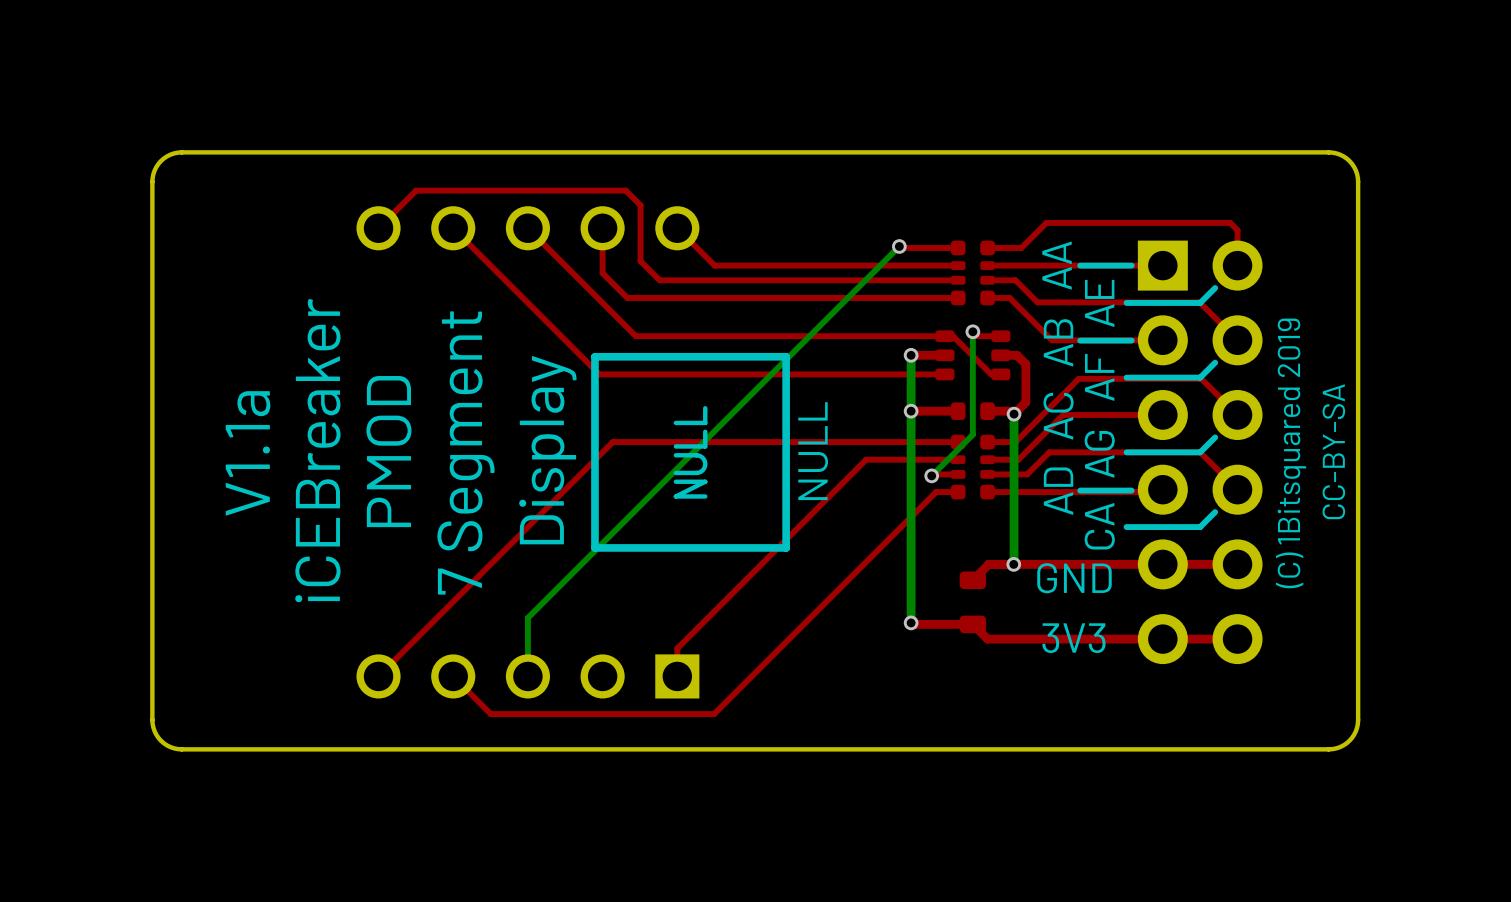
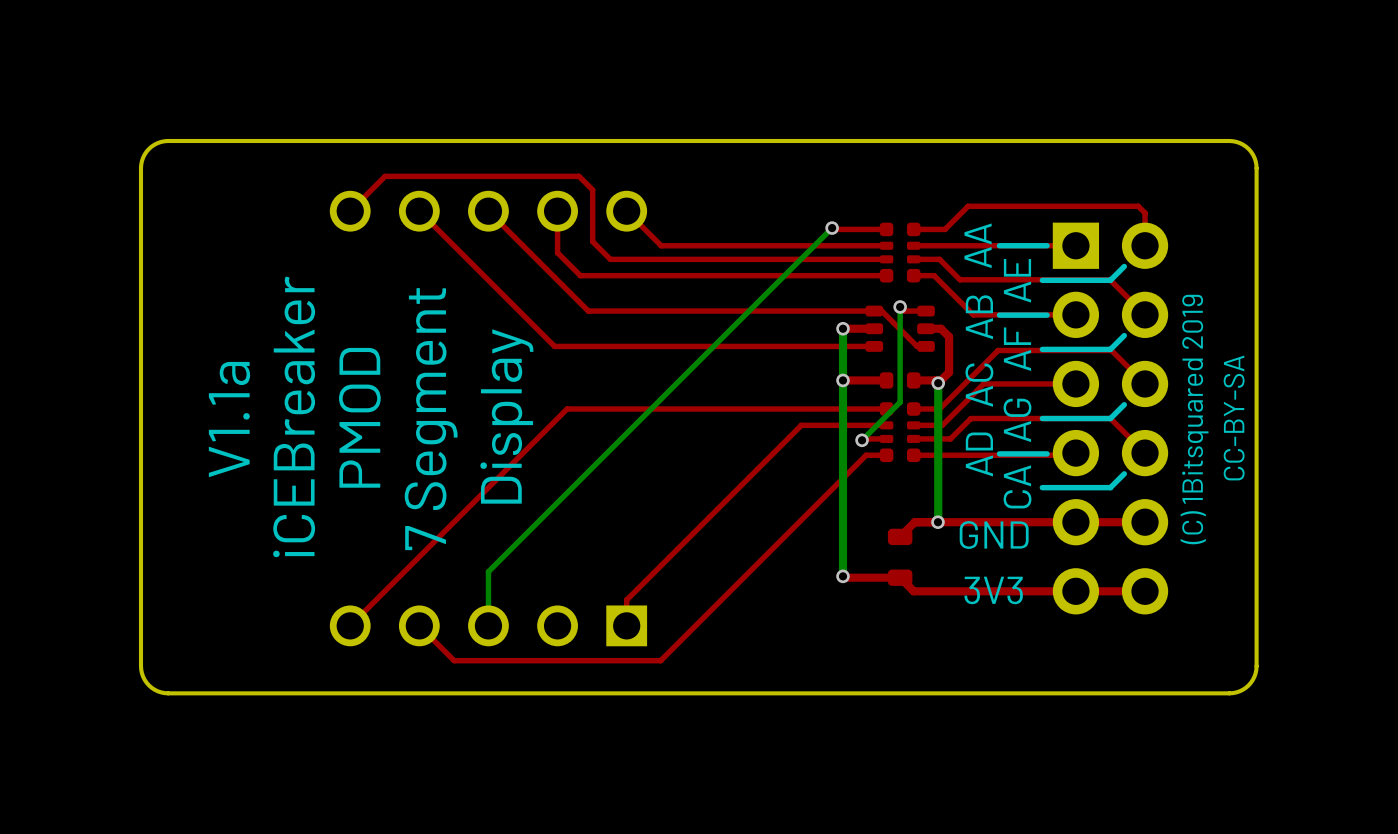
drawing: [591, 352, 790, 552] -> none
text: NULL (813, 451) -> none

